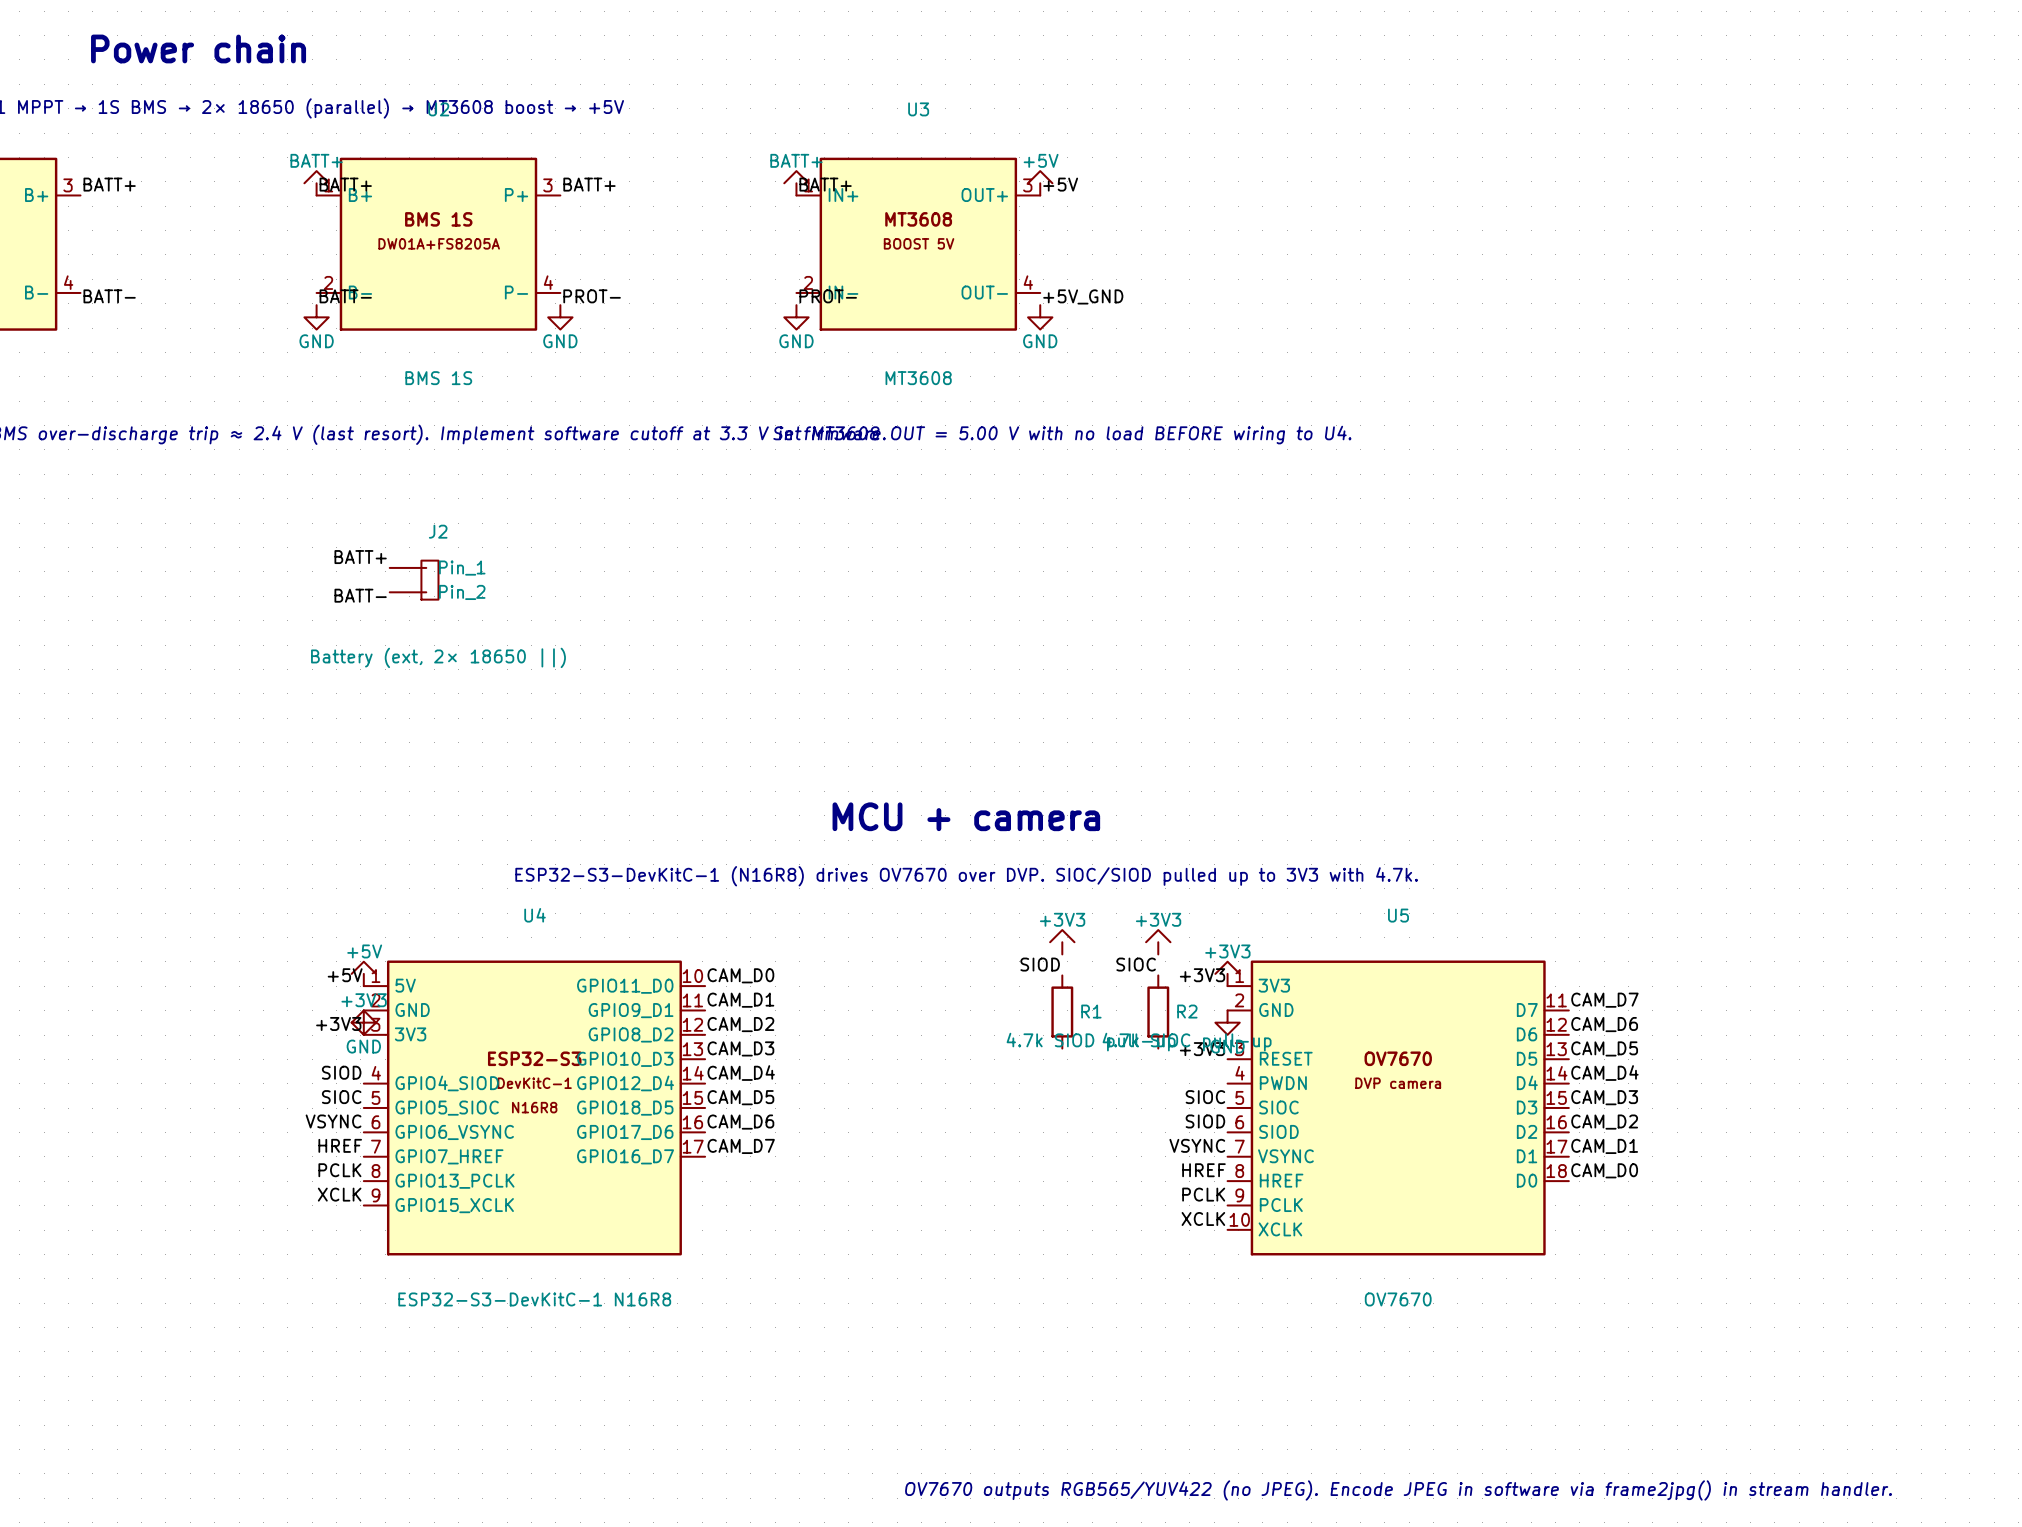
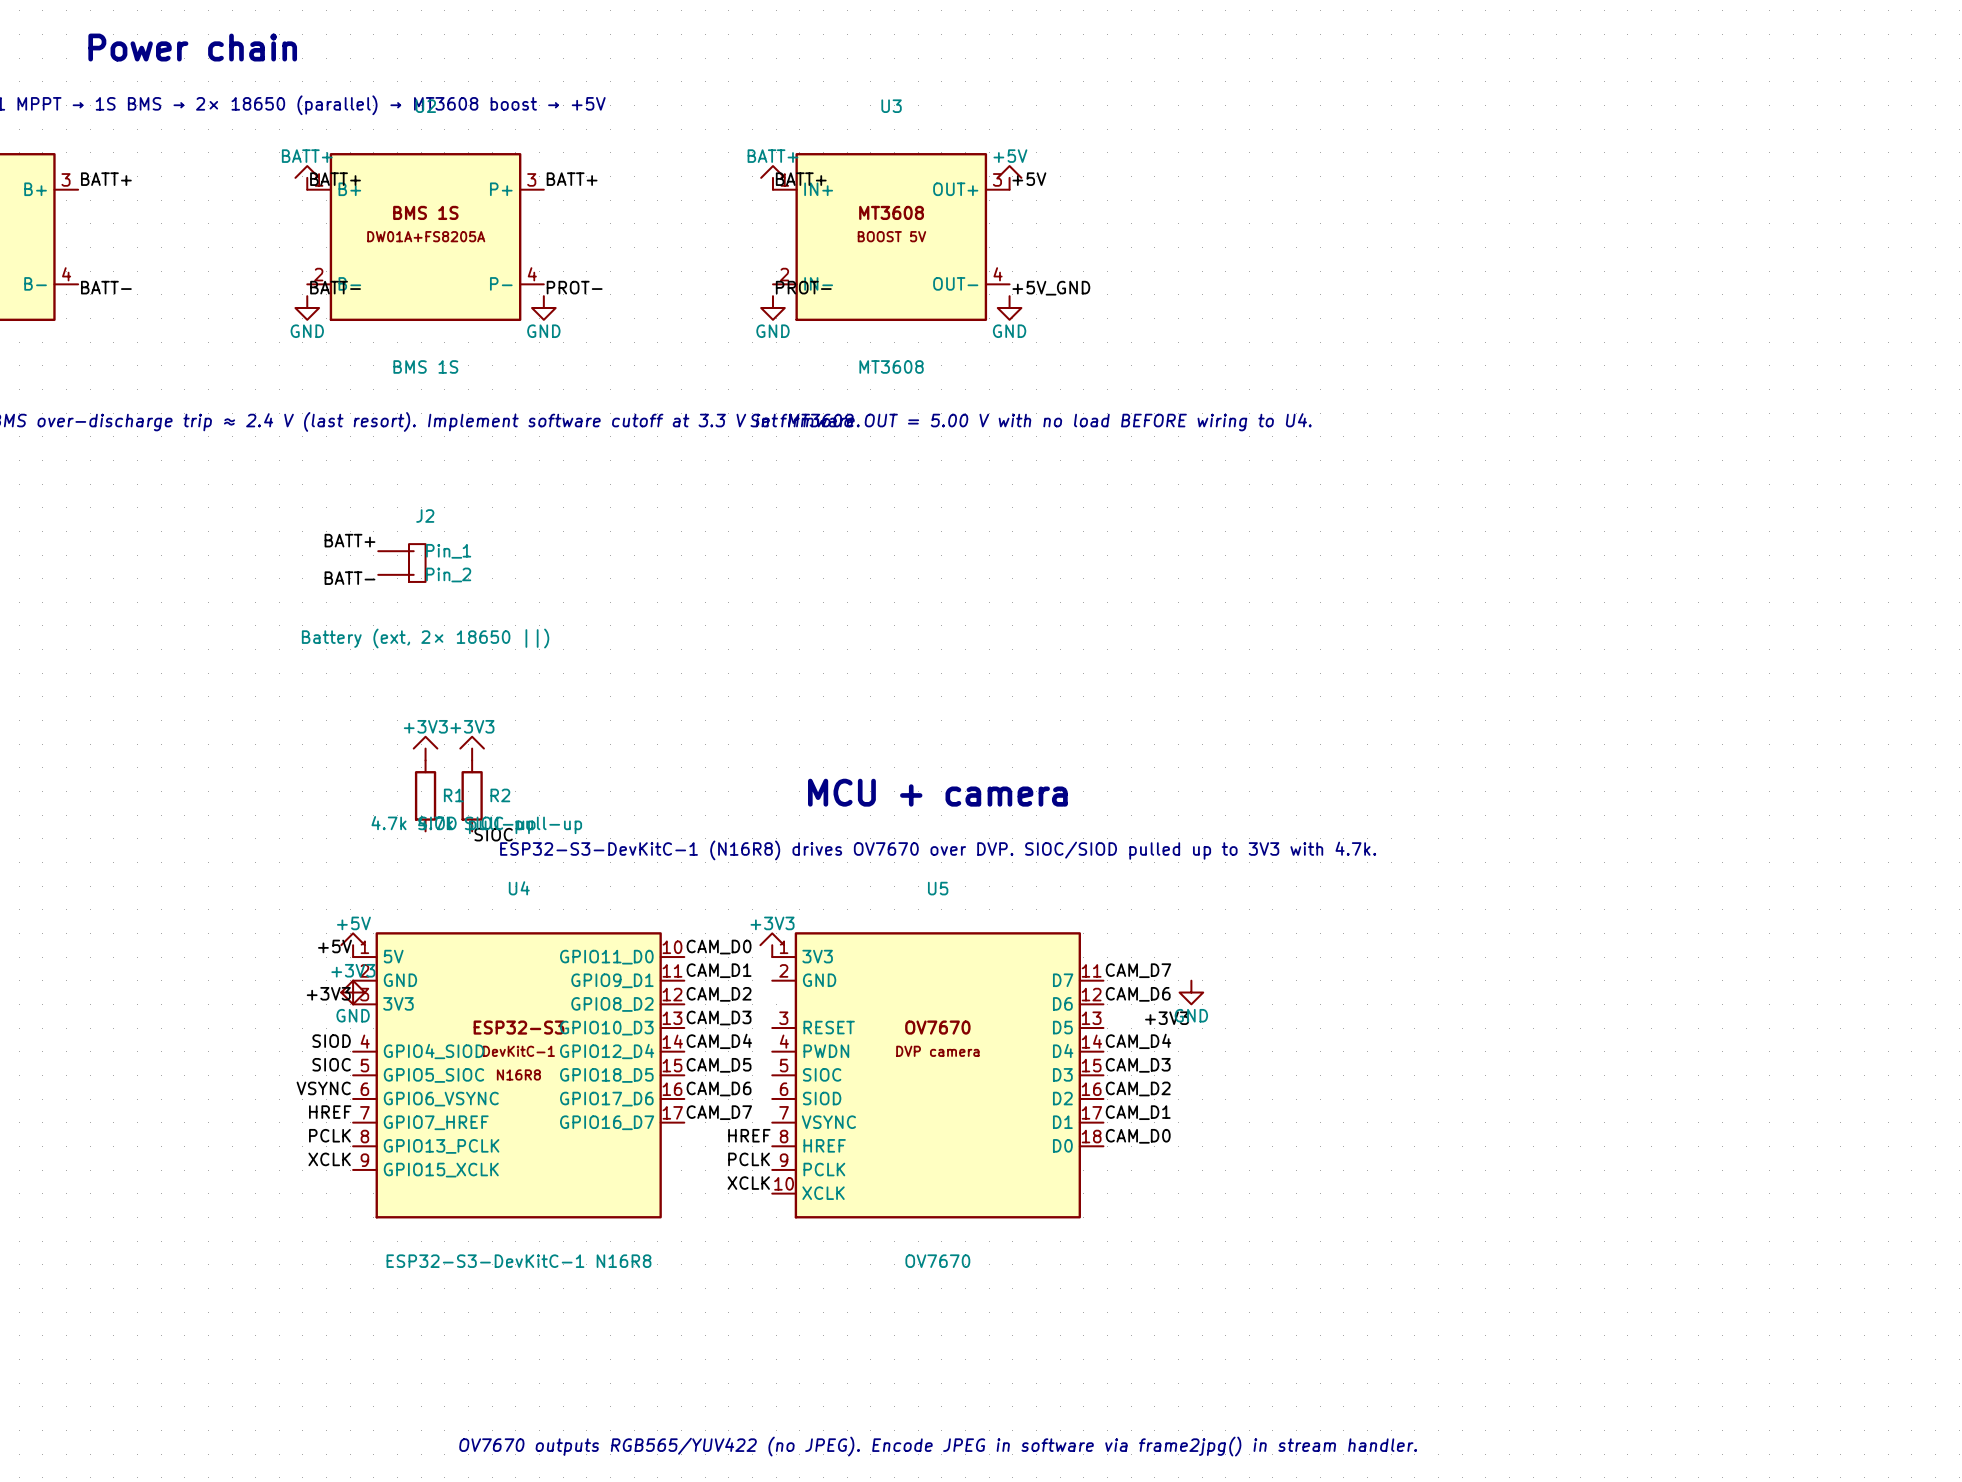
power symbol: none -> +3V3 (425, 748)
power symbol: none -> +3V3 (472, 748)
label: none -> SIOC (493, 834)
power symbol: +3V3 (1062, 942) -> none
power symbol: +3V3 (1158, 942) -> none
label: SIOD (1040, 964) -> none
label: SIOC (1136, 964) -> none
power symbol: none -> +3V3 (772, 945)
power symbol: +3V3 (1227, 973) -> none
label: +3V3 (1202, 975) -> none
label: none -> CAM_D7 (1138, 970)
label: CAM_D7 (1604, 1000) -> none
R1 position: (1062, 1012) -> (425, 795)
R2 position: (1158, 1012) -> (472, 795)
label: none -> CAM_D6 (1138, 994)
label: CAM_D6 (1604, 1024) -> none
label: CAM_D5 (1604, 1048) -> none
label: none -> CAM_D4 (1138, 1041)
label: CAM_D4 (1604, 1073) -> none
label: none -> CAM_D3 (1138, 1065)
label: SIOC (1205, 1097) -> none
label: CAM_D3 (1604, 1097) -> none
U5 position: (1398, 1107) -> (937, 1075)
label: SIOD (1205, 1121) -> none
label: none -> CAM_D2 (1138, 1088)
label: CAM_D2 (1604, 1122) -> none
label: VSYNC (1197, 1145) -> none
label: none -> CAM_D1 (1138, 1112)
label: CAM_D1 (1604, 1146) -> none
label: none -> HREF (749, 1135)
label: none -> CAM_D0 (1138, 1136)
label: HREF (1203, 1170) -> none
label: CAM_D0 (1604, 1170) -> none
label: none -> PCLK (749, 1159)
label: PCLK (1203, 1194) -> none
label: none -> XCLK (748, 1183)
label: XCLK (1203, 1218) -> none
text: none -> OV7670 outputs RGB565/YUV422 (no JPEG). Encode JPEG in software via frame2jpg() in stream handler. (938, 1446)
text: OV7670 outputs RGB565/YUV422 (no JPEG). Encode JPEG in software via frame2jpg() in stream handler. (1398, 1490) -> none

